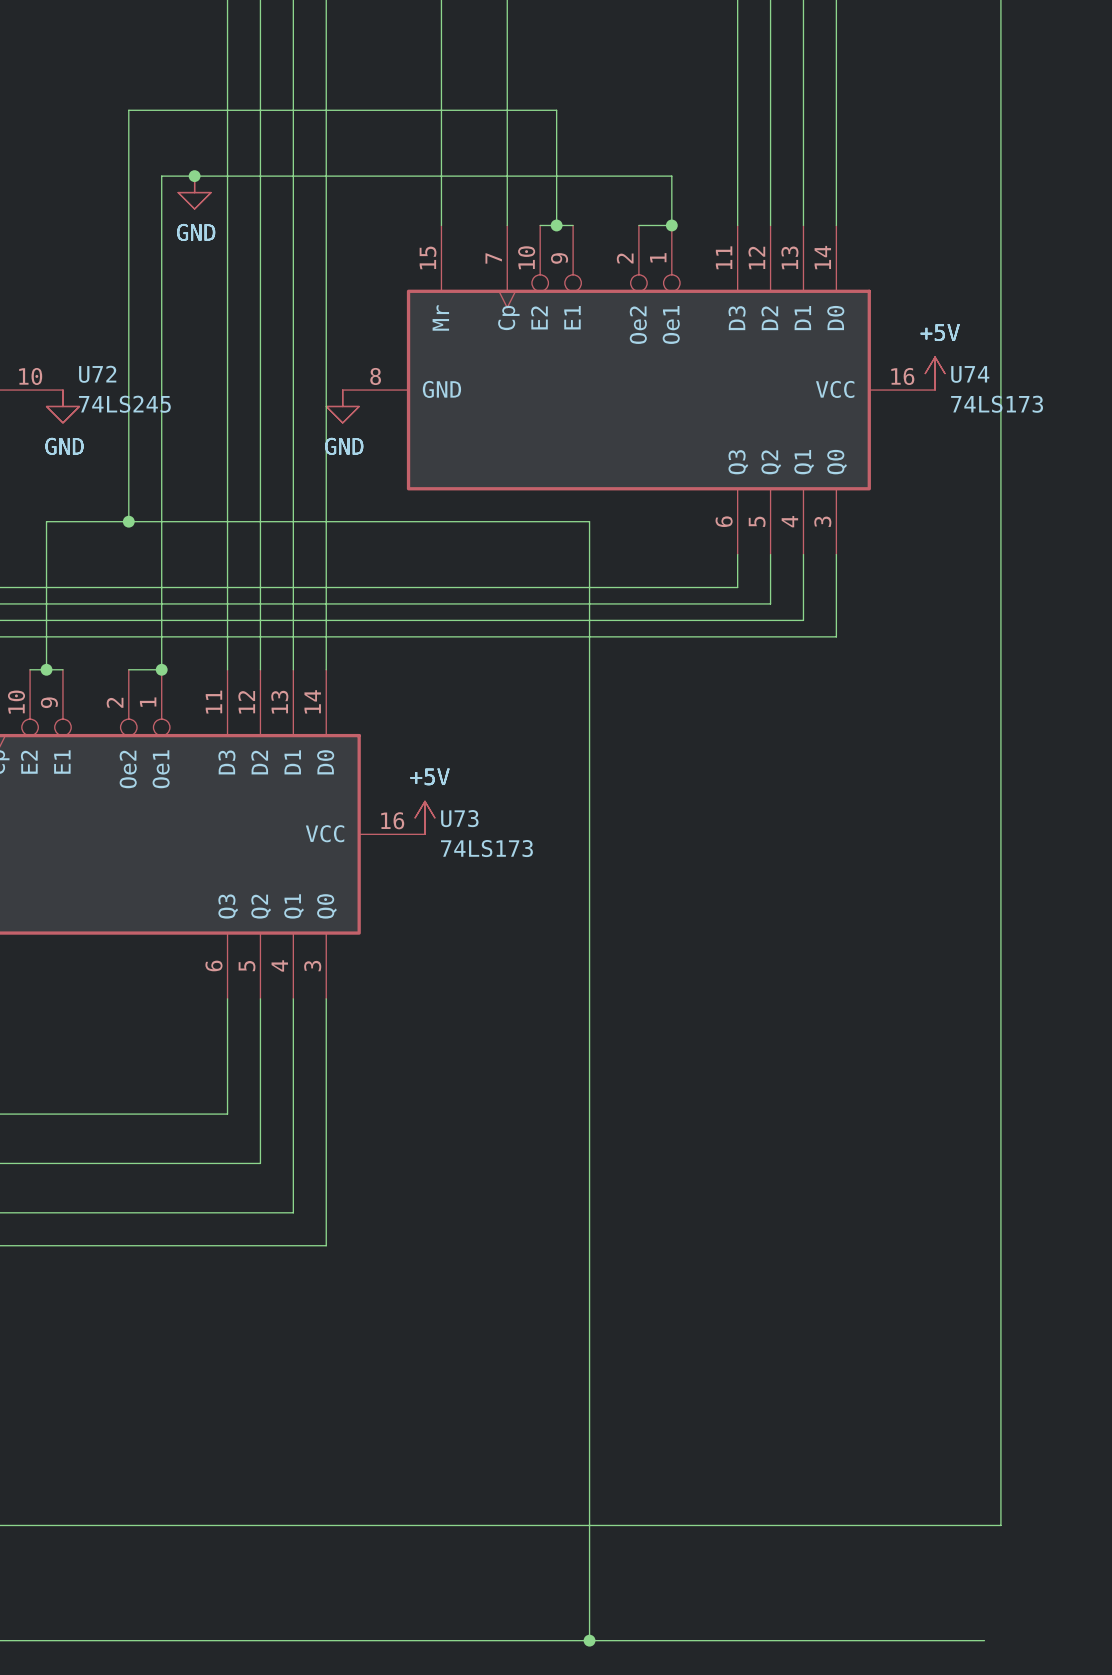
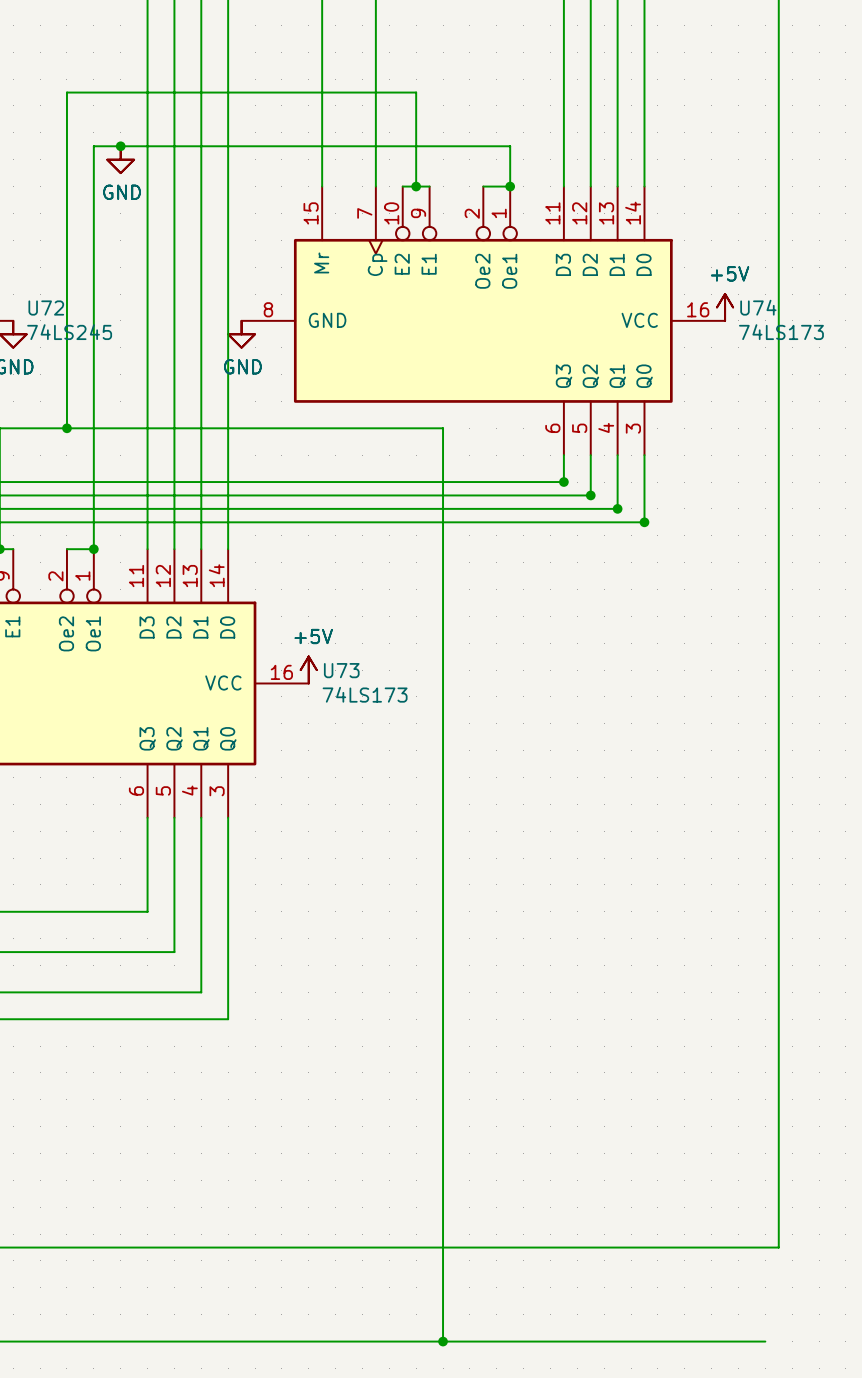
junction: none -> (563, 482)
junction: none -> (590, 495)
junction: none -> (617, 508)
junction: none -> (644, 522)

